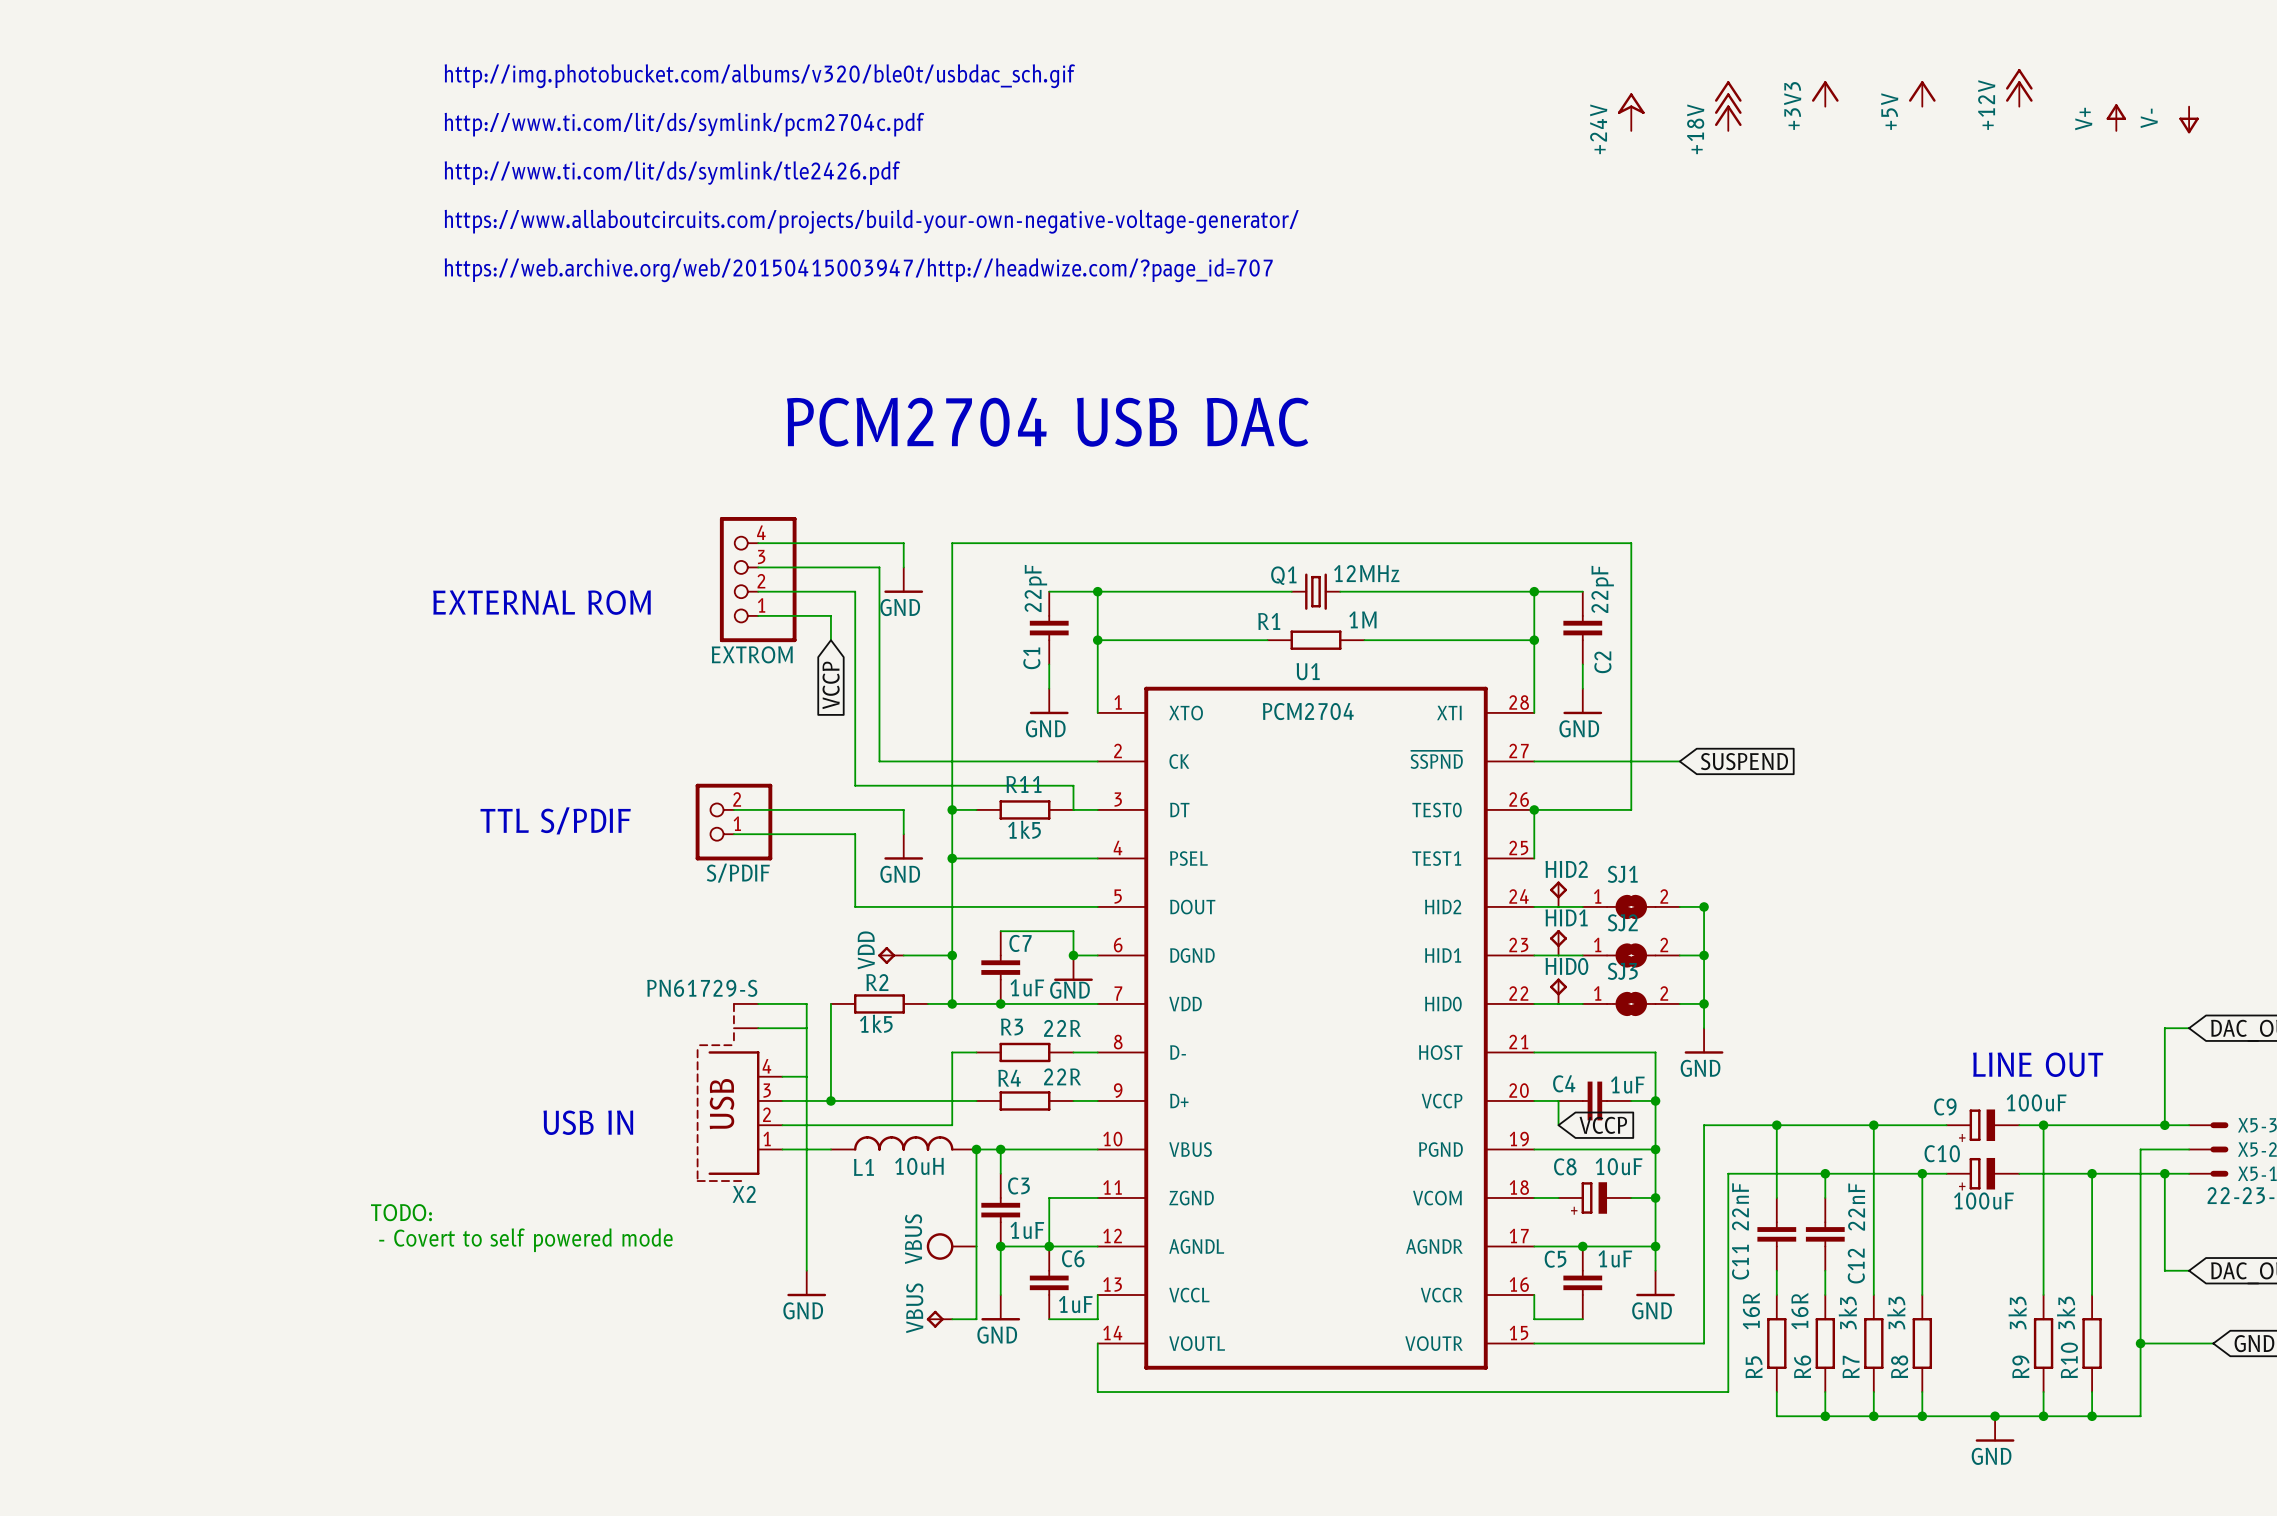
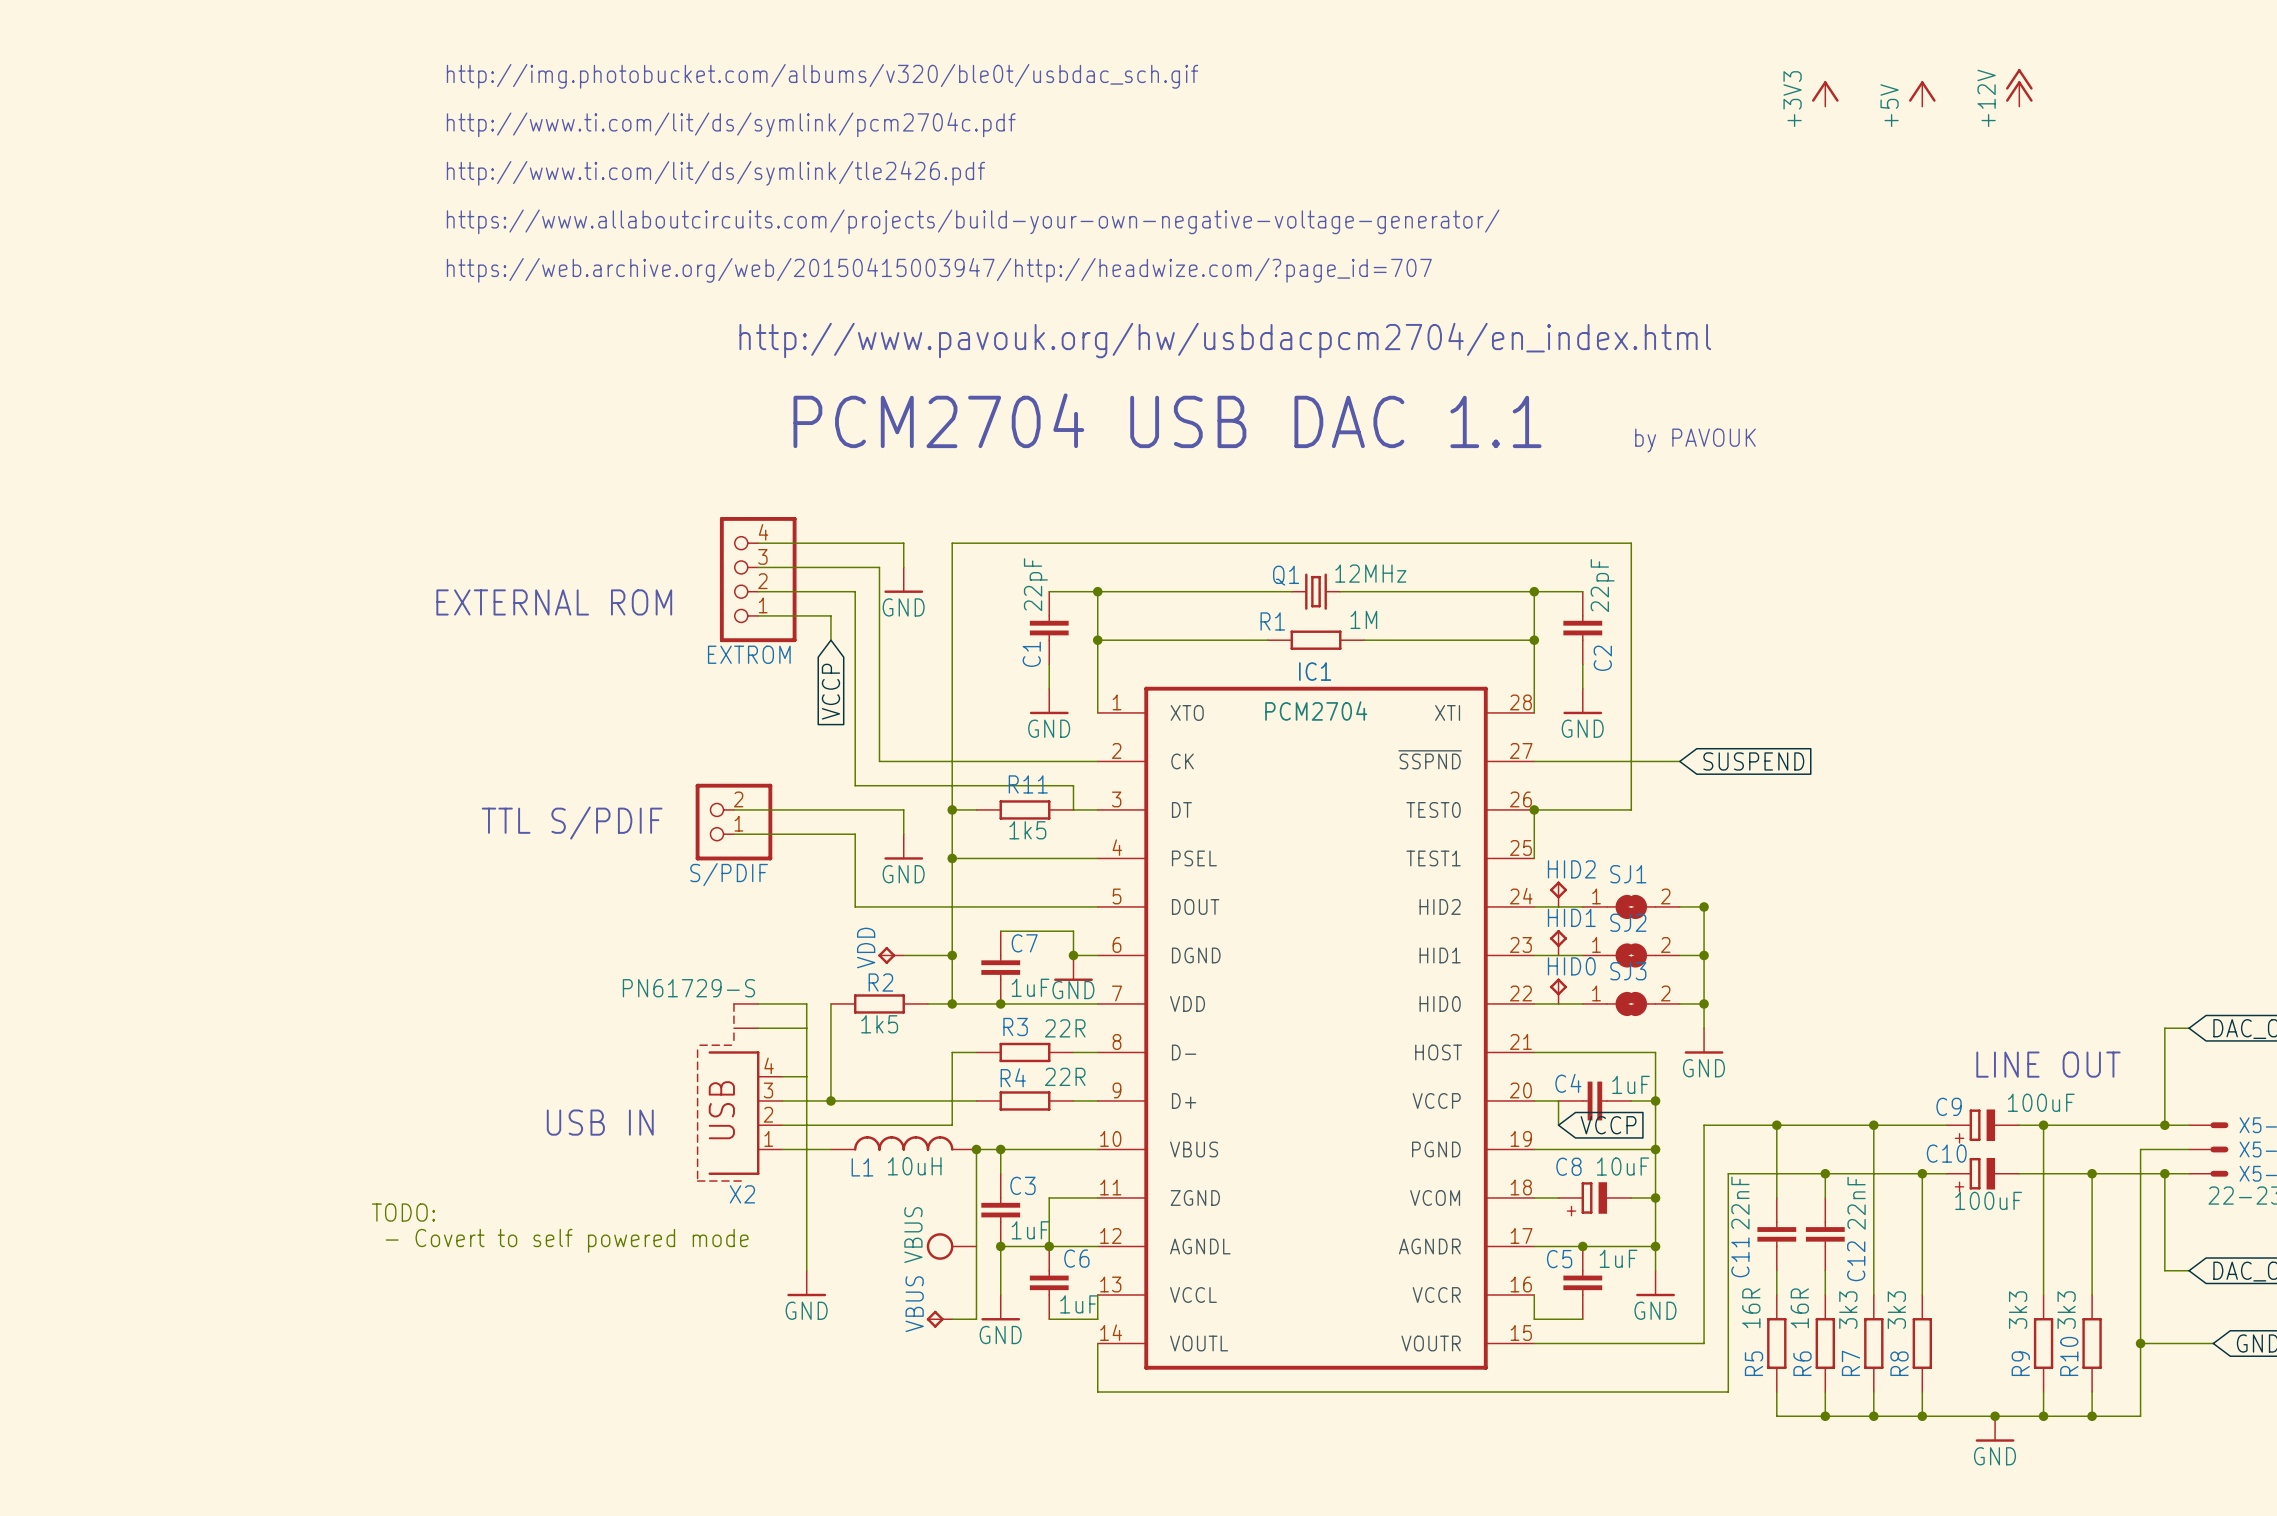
power symbol: +18V (1728, 106) -> none
power symbol: +24V (1631, 112) -> none
power symbol: V+ (2116, 117) -> none
power symbol: V- (2189, 119) -> none
text: none -> http://www.pavouk.org/hw/usbdacpcm2704/en_index.html (1225, 340)
text: PCM2704 USB DAC (1047, 422) -> PCM2704 USB DAC 1.1 (1167, 420)
text: none -> by PAVOUK (1695, 440)
U1 name: U1 (1308, 671) -> IC1 (1315, 671)

